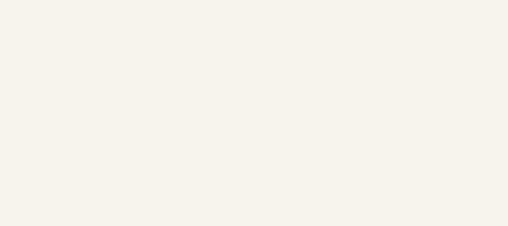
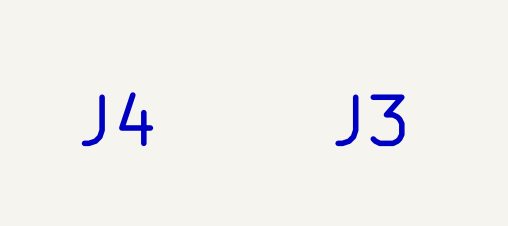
text: none -> J4 (117, 119)
text: none -> J3 (369, 120)

